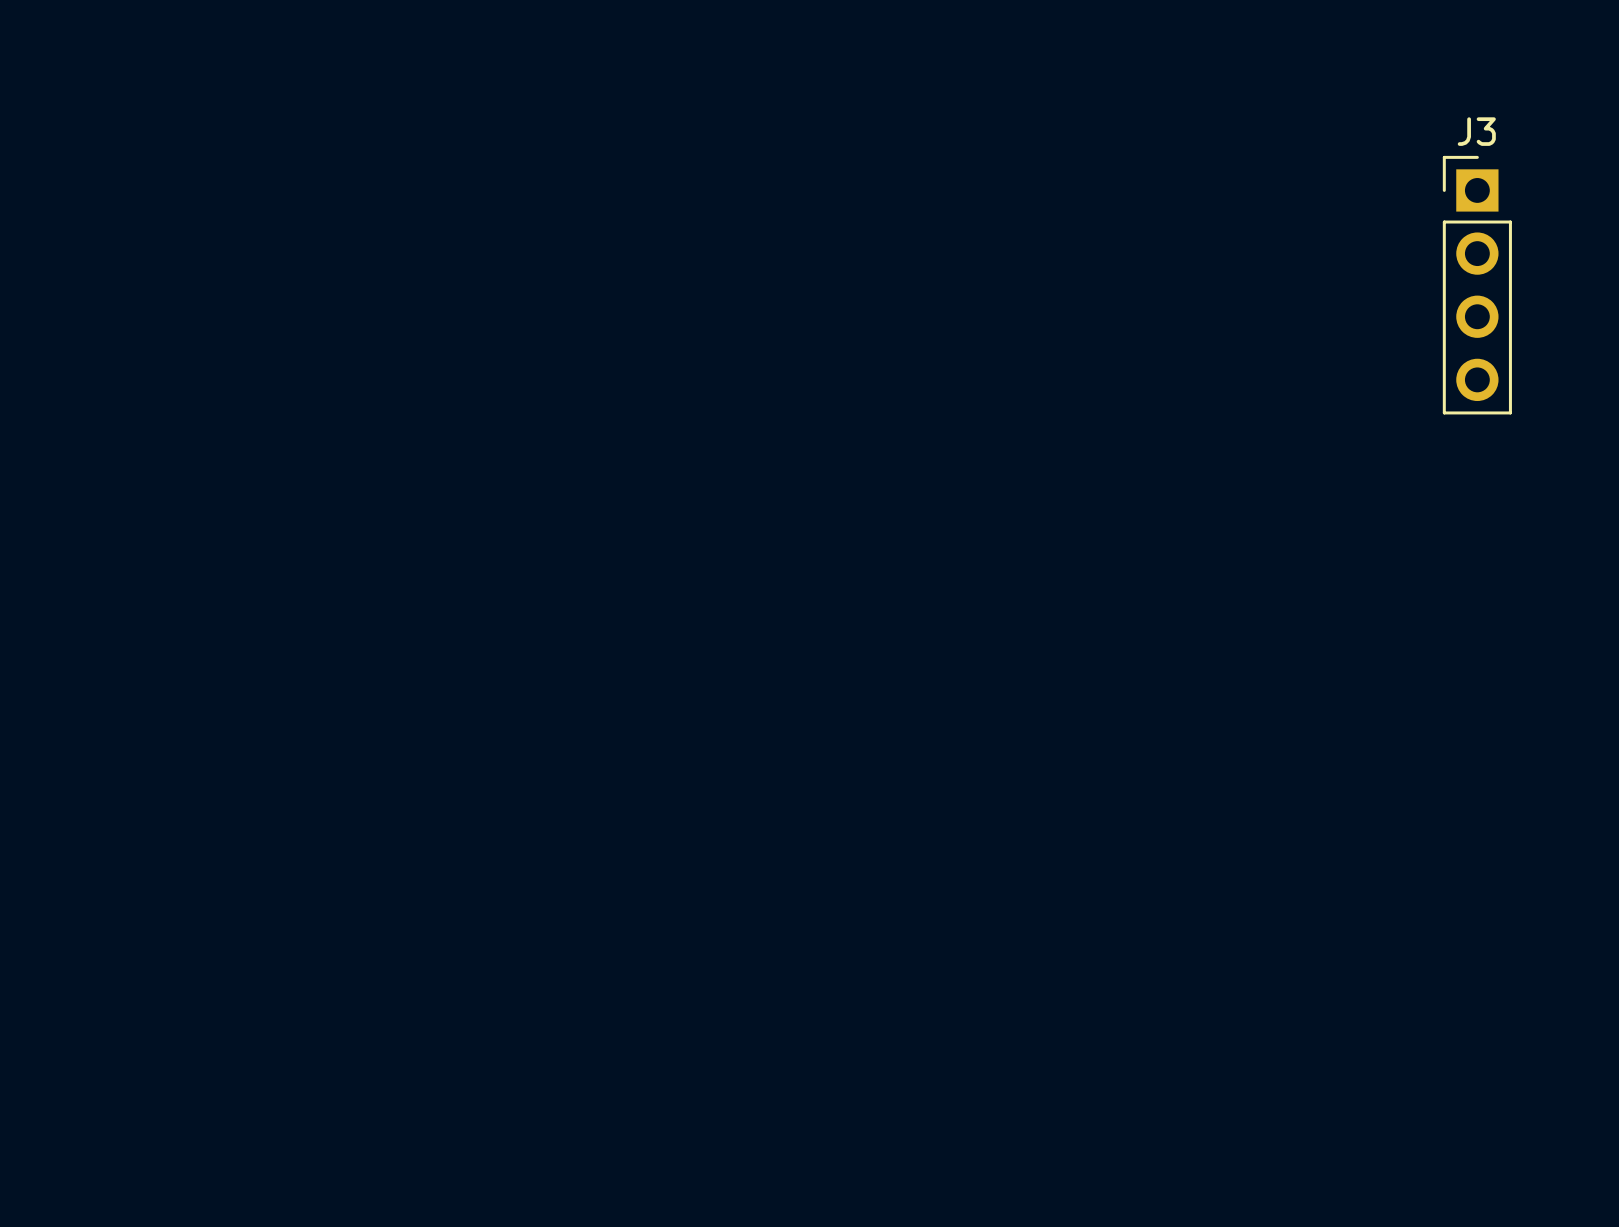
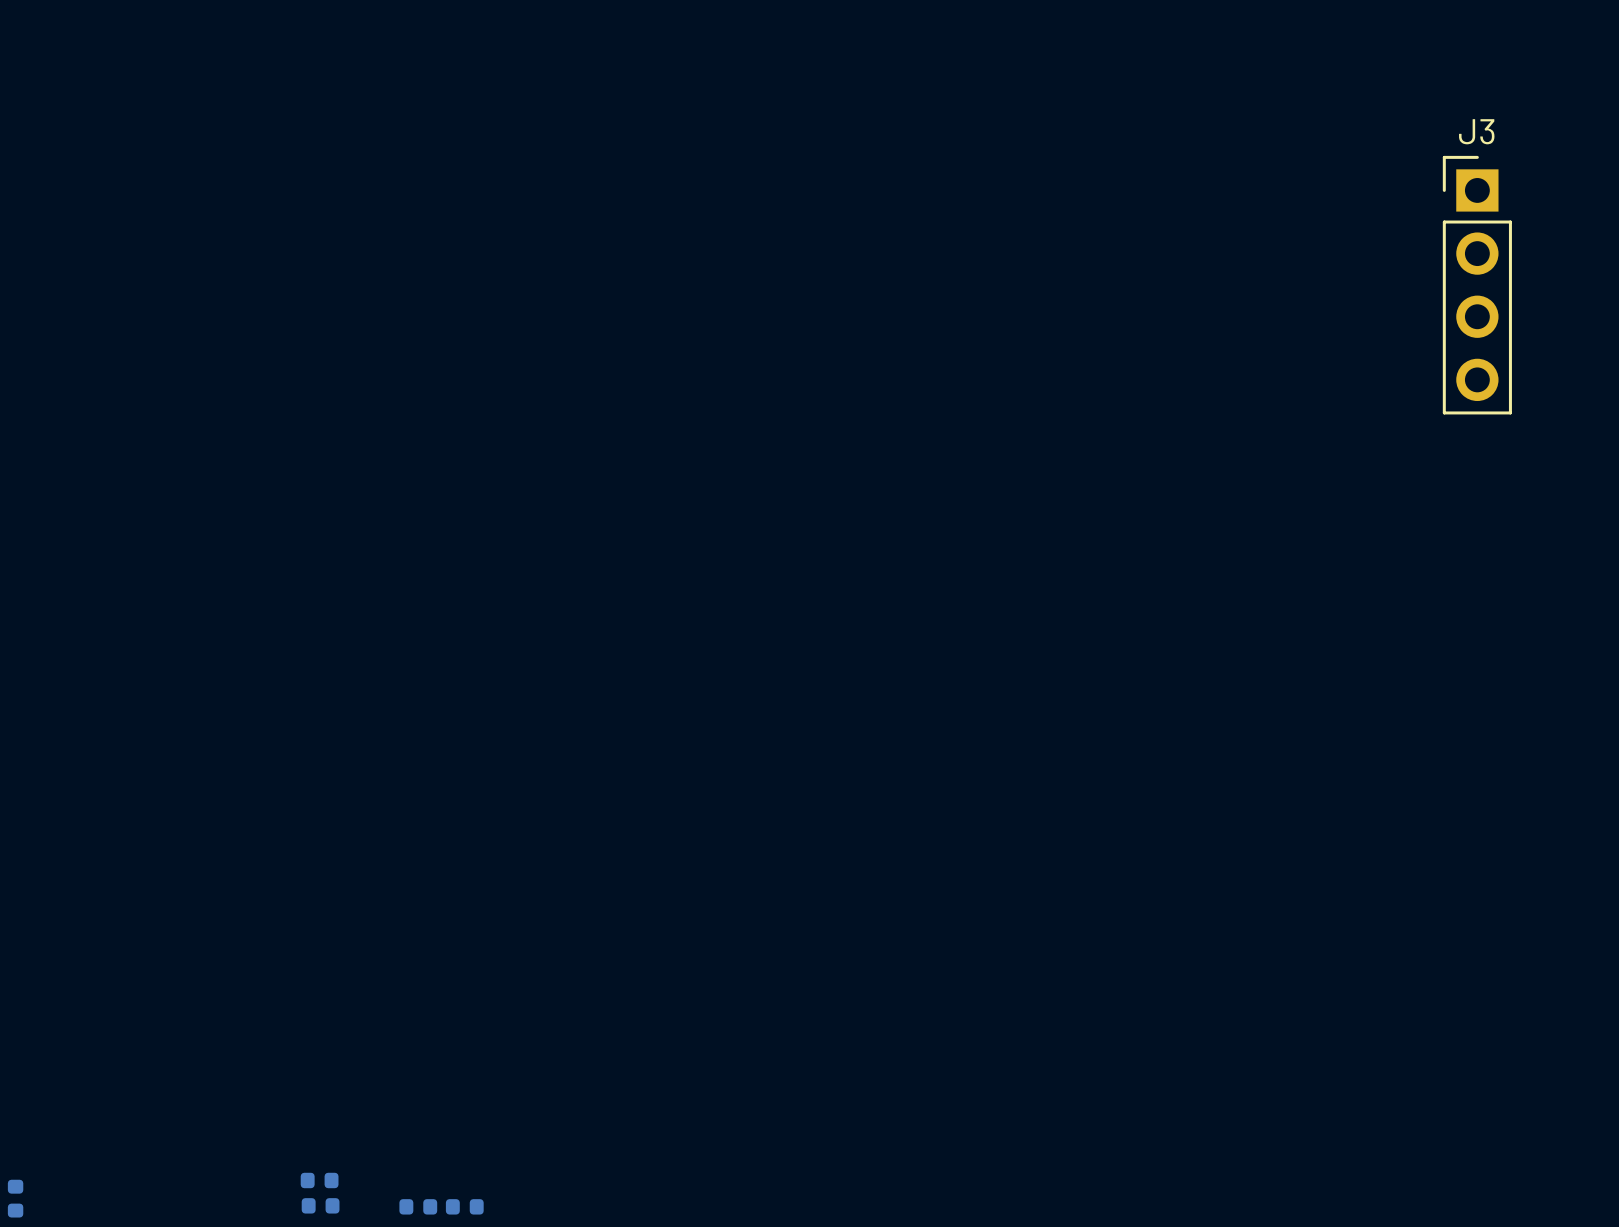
part: none -> (319, 1180)
part: none -> (15, 1198)
part: none -> (320, 1205)
part: none -> (418, 1206)
part: none -> (464, 1206)

